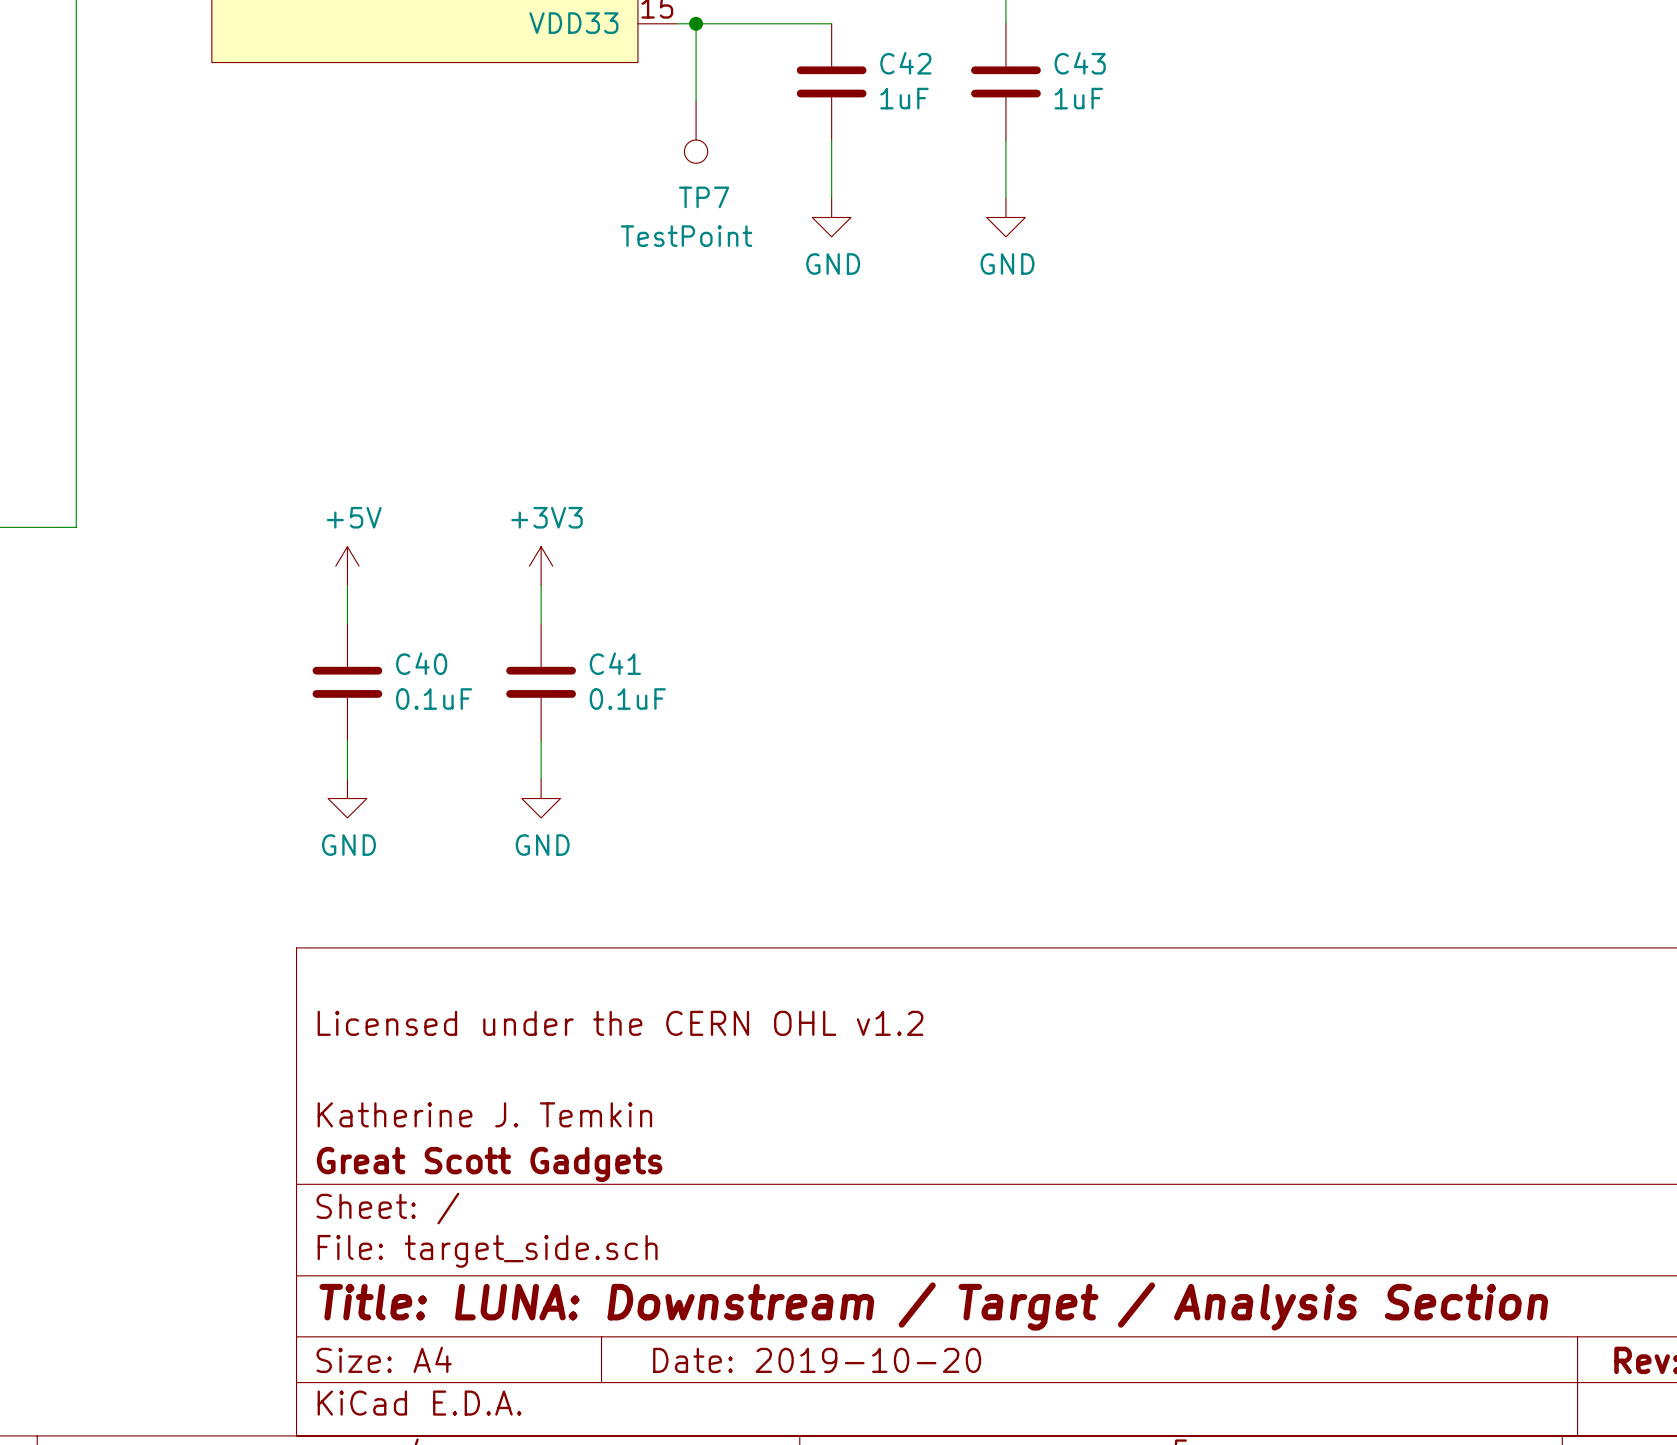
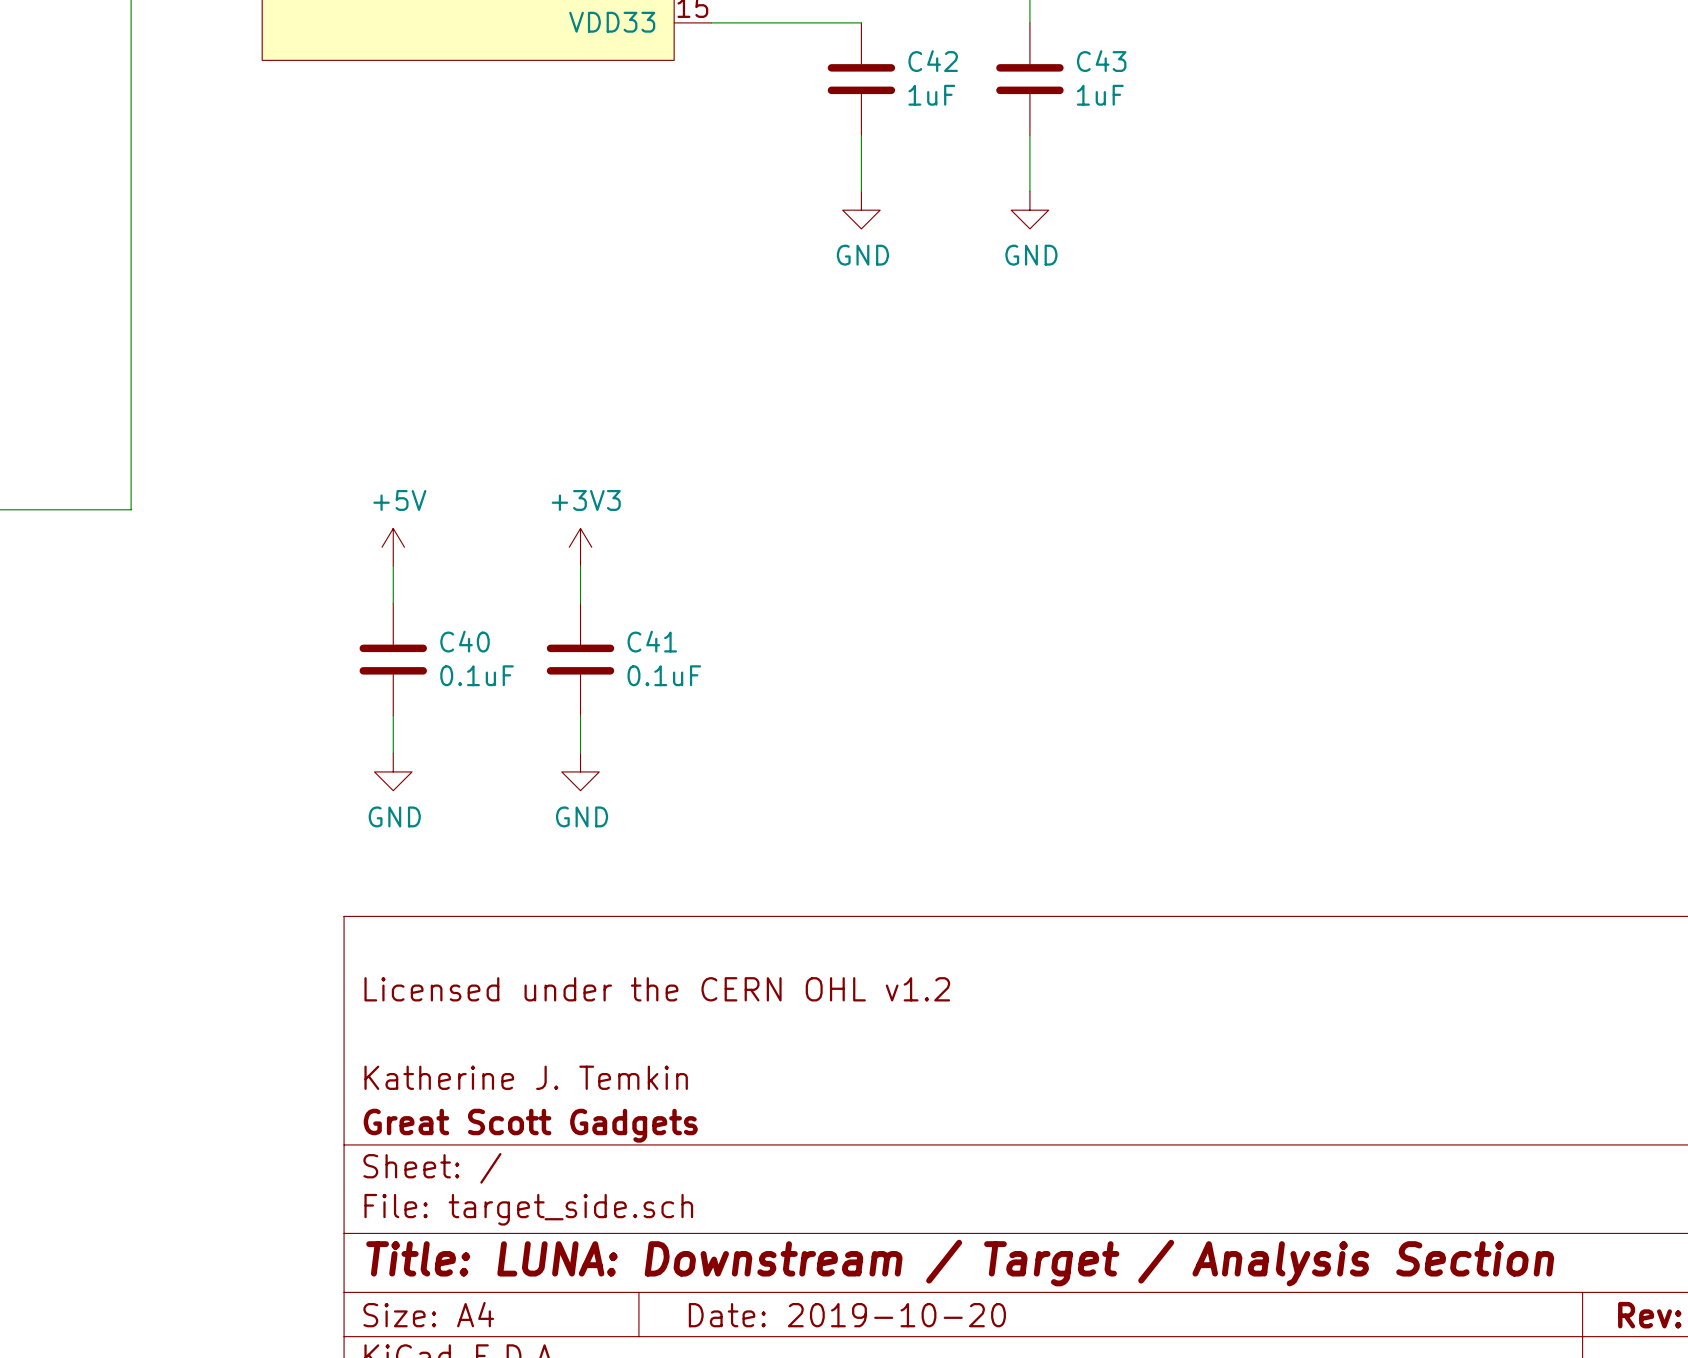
wire: (696, 23) (696, 101) -> none
junction: (696, 23) -> none
TP7: TestPoint (696, 132) -> none

